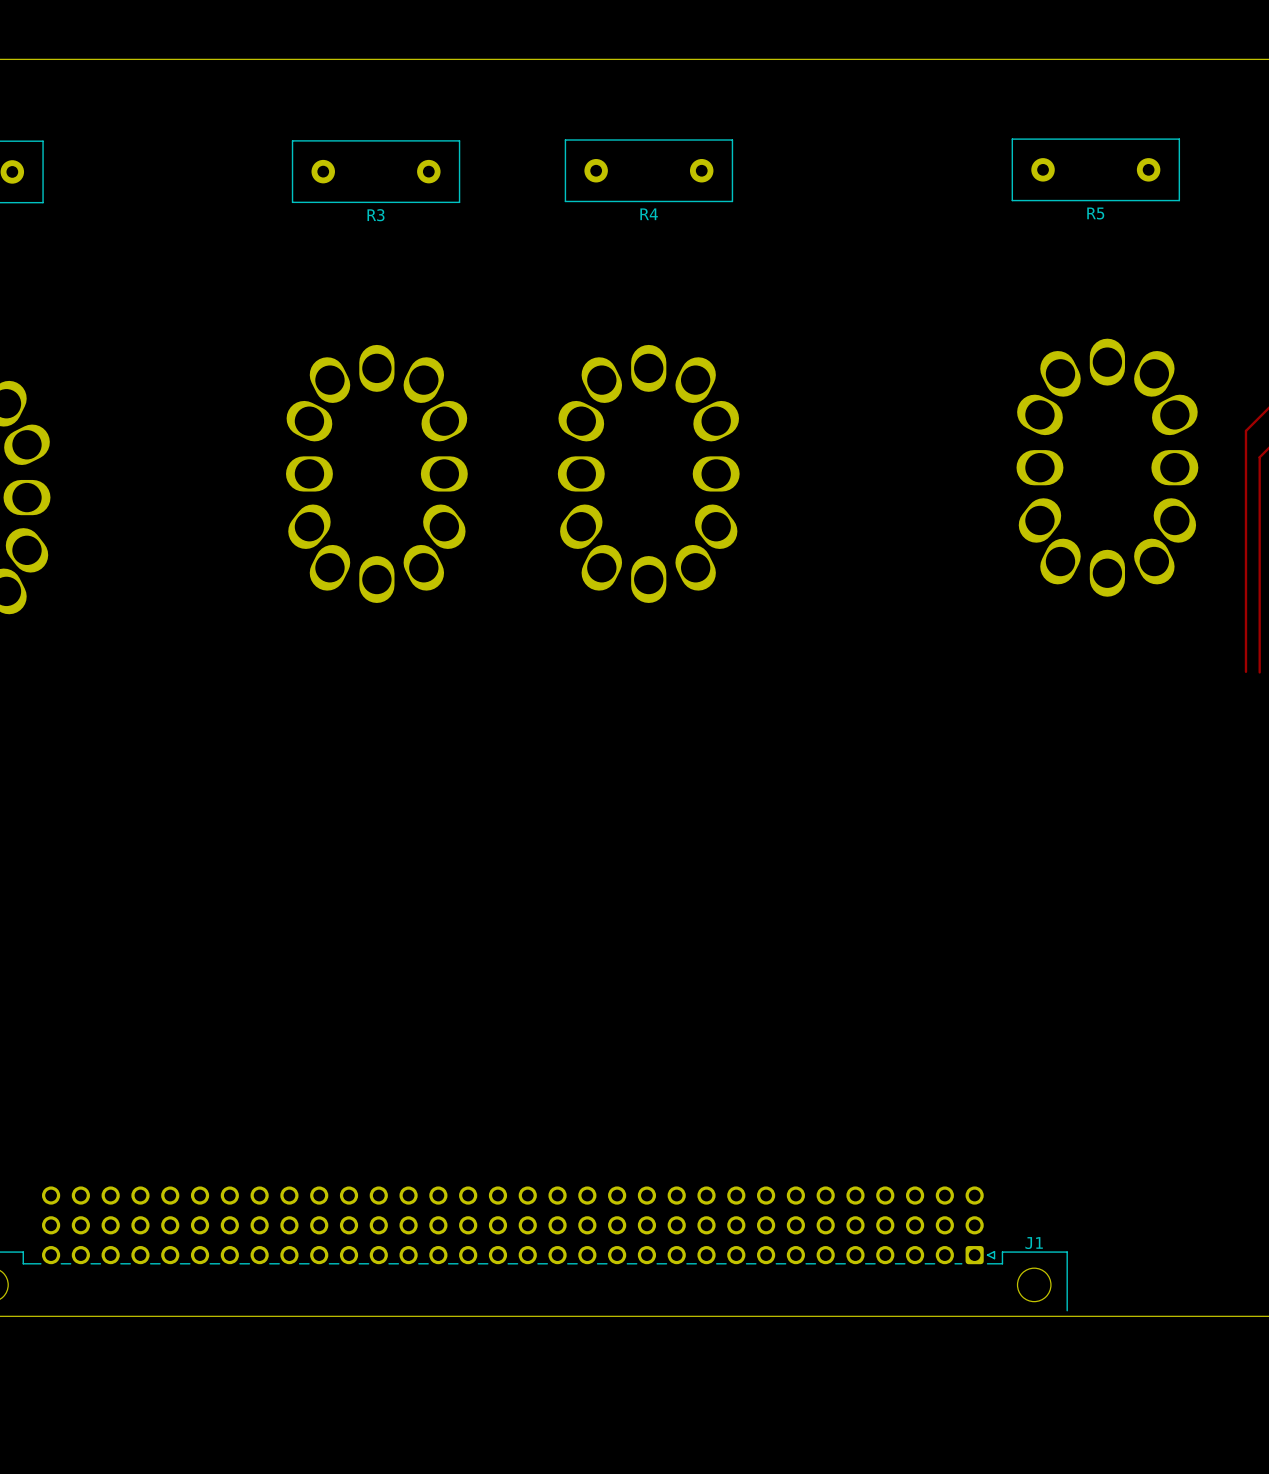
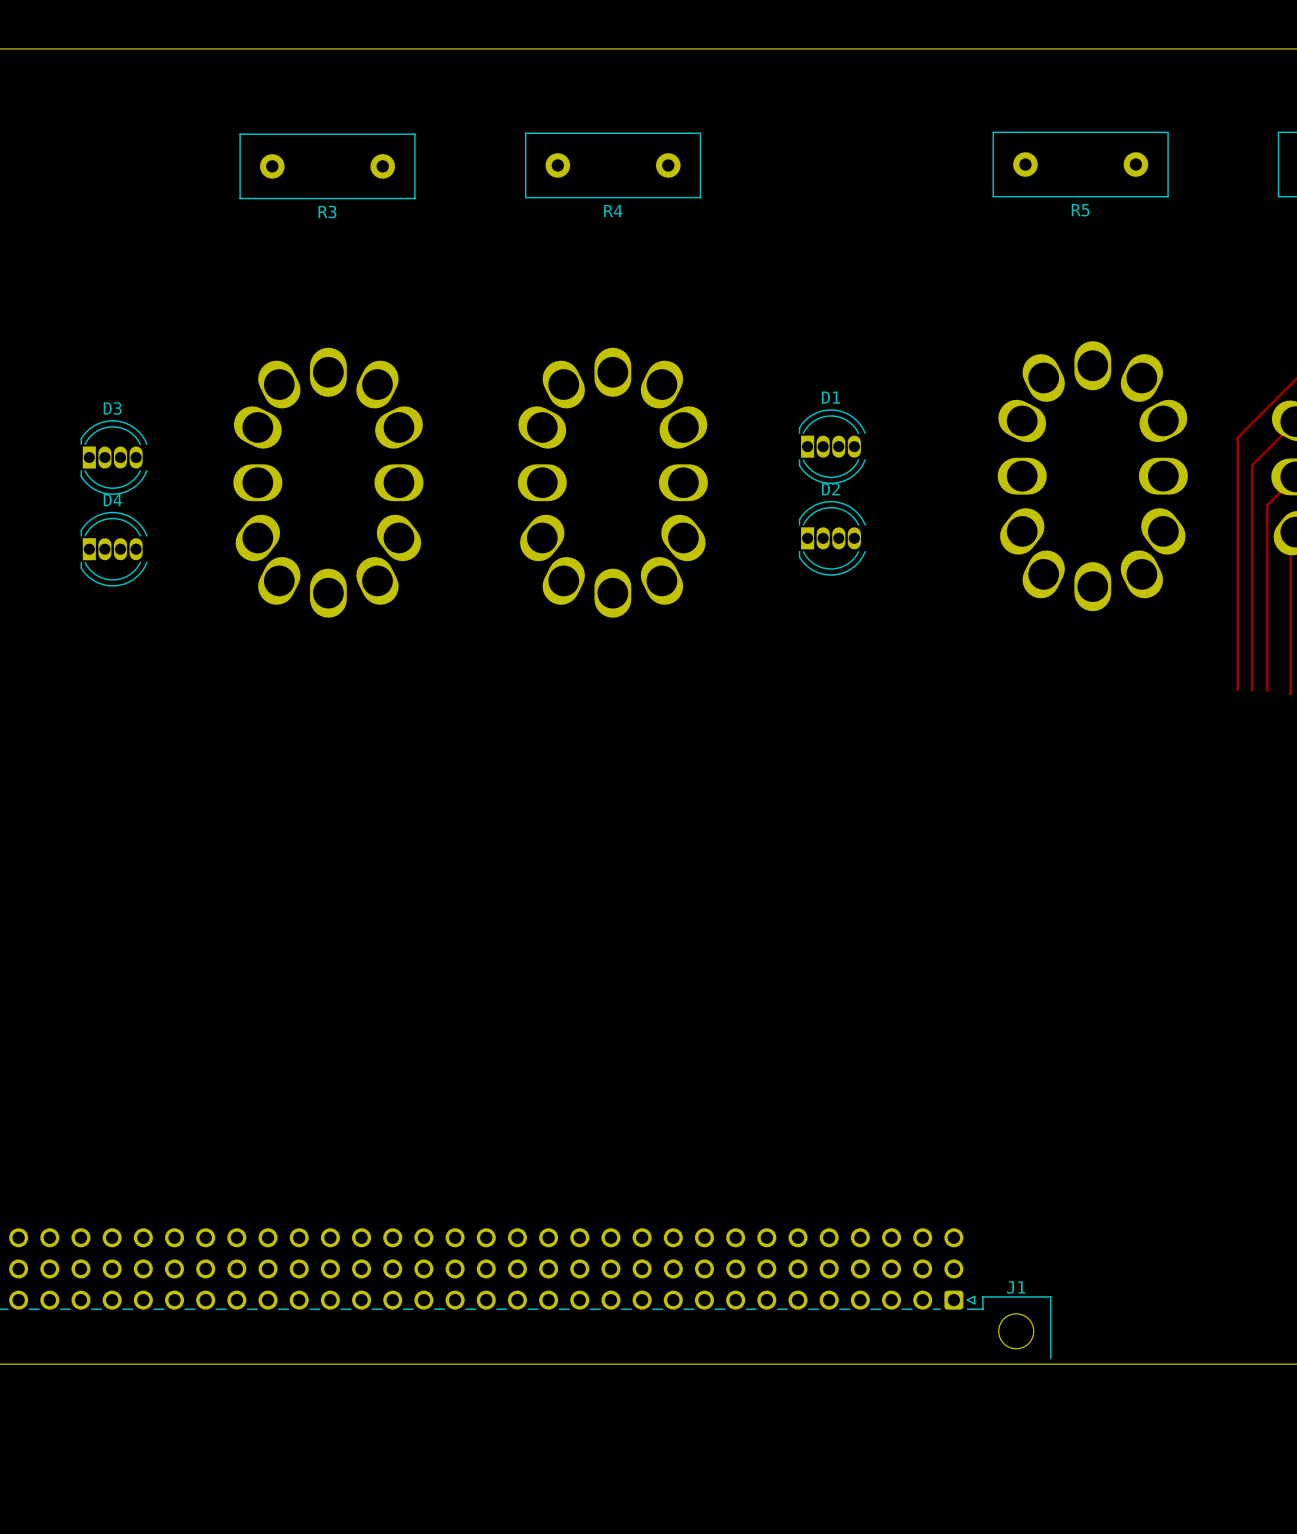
D1: none -> (832, 446)
D3: none -> (114, 457)
D2: none -> (832, 538)
D4: none -> (114, 549)

